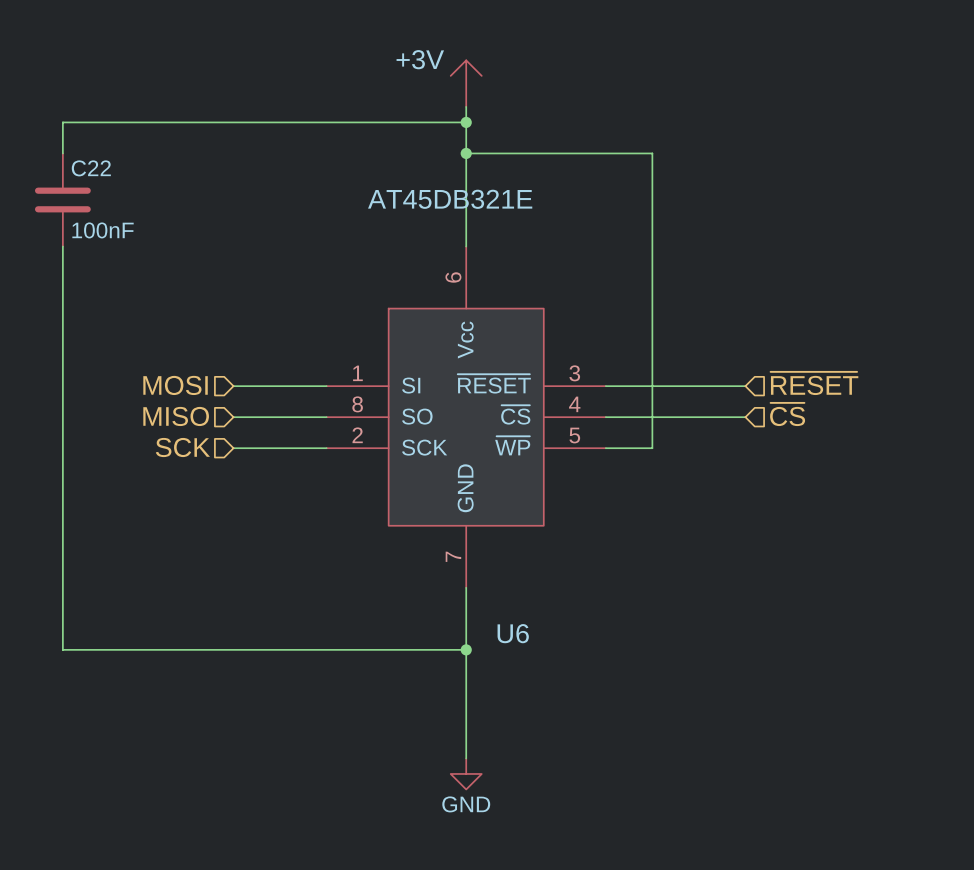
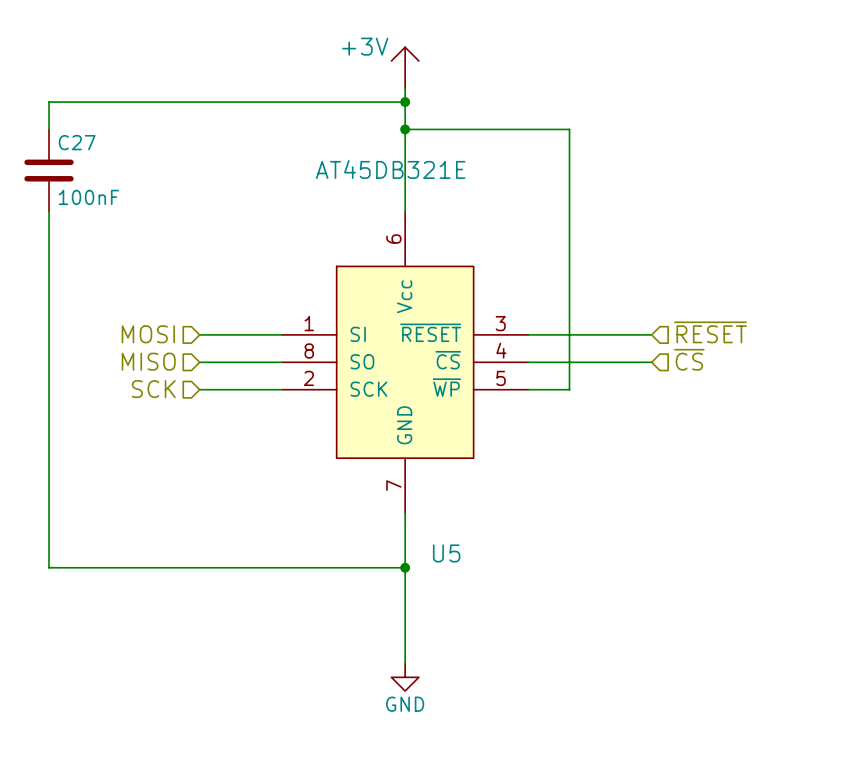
C22 name: C22 (91, 168) -> C27 (77, 142)
U6 name: U6 (513, 633) -> U5 (446, 553)

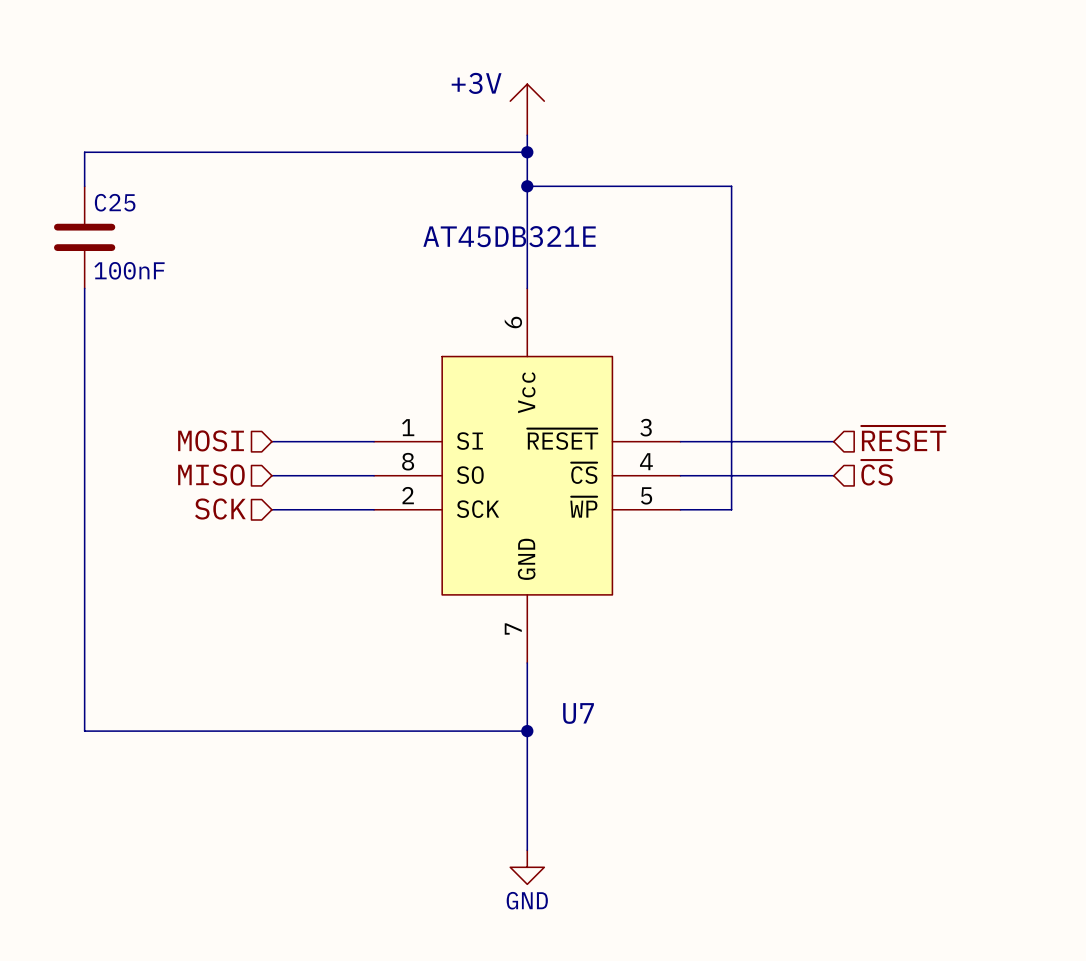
C27 name: C27 (77, 142) -> C25 (115, 202)
U5 name: U5 (446, 553) -> U7 (578, 713)

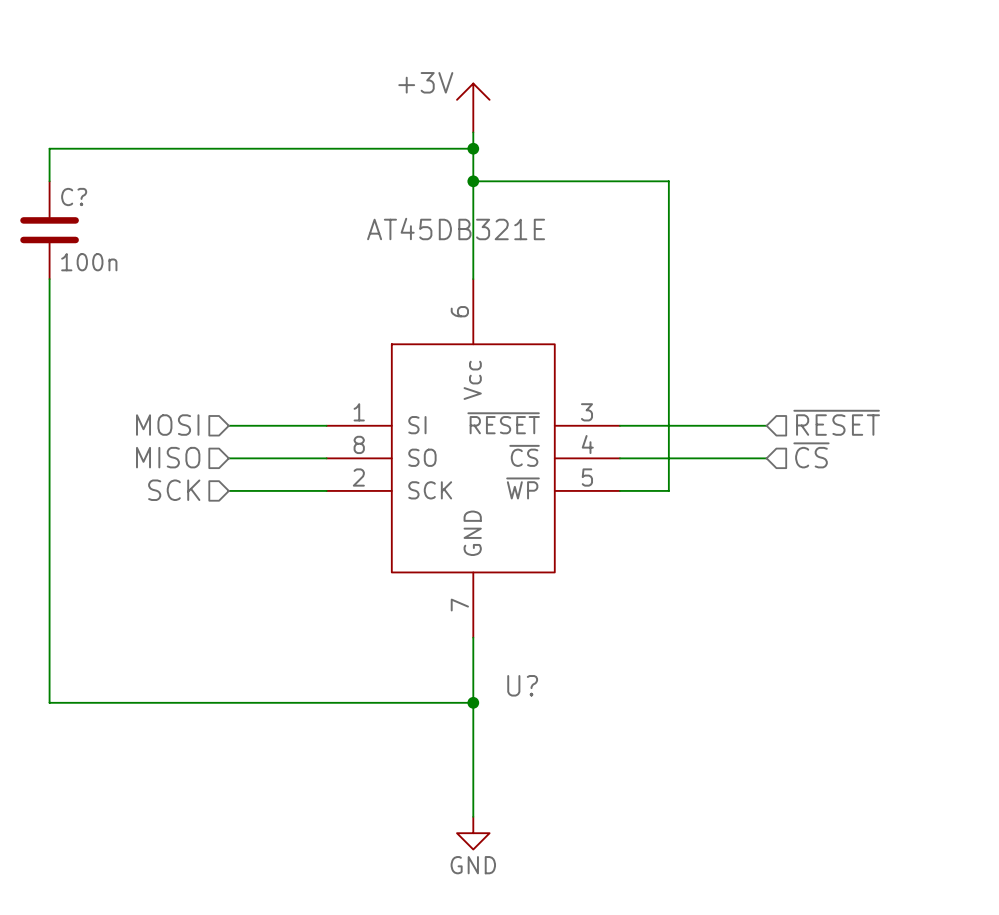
C25 name: C25 (115, 202) -> C? (74, 197)
C25 value: 100nF (129, 270) -> 100n (89, 262)
U7 name: U7 (578, 713) -> U? (522, 685)

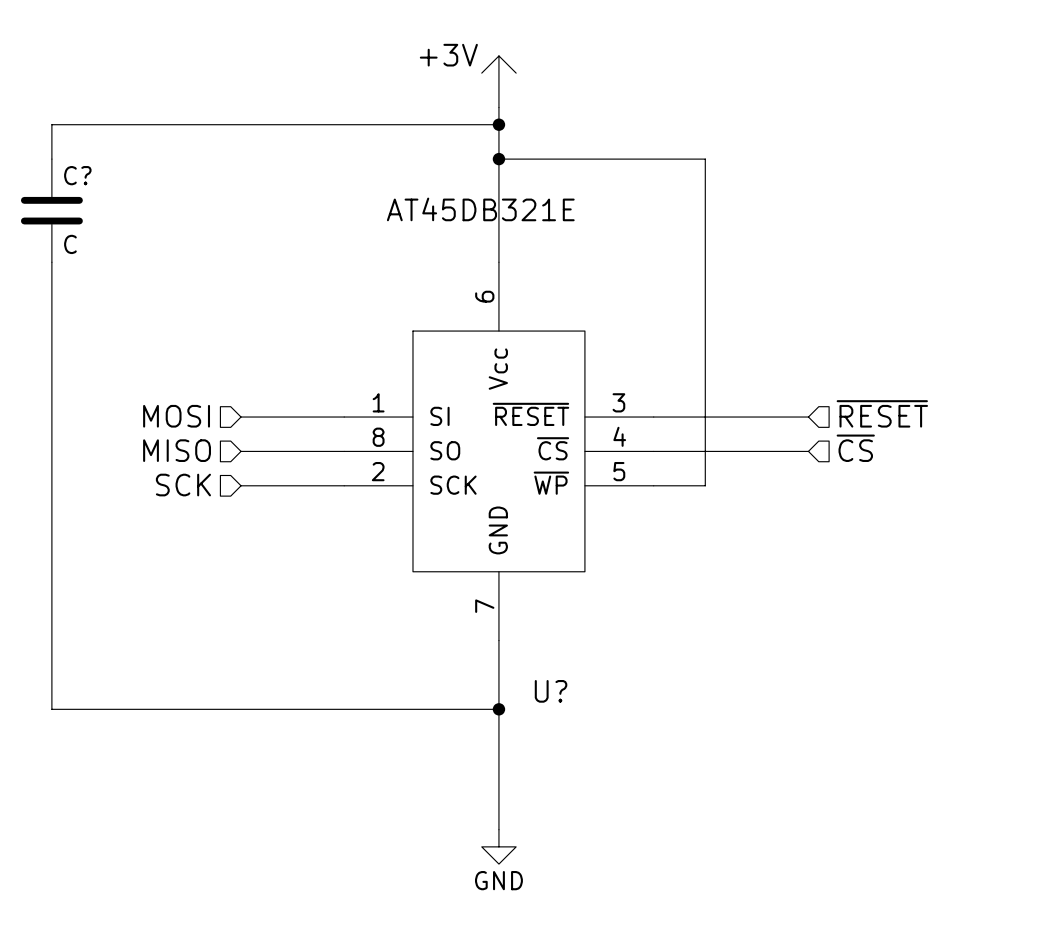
C? value: 100n (89, 262) -> C (70, 244)

